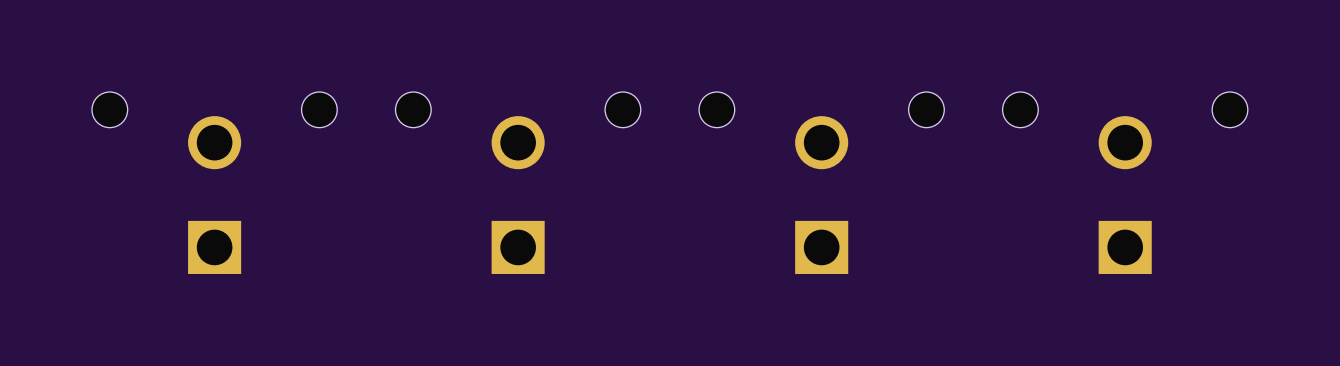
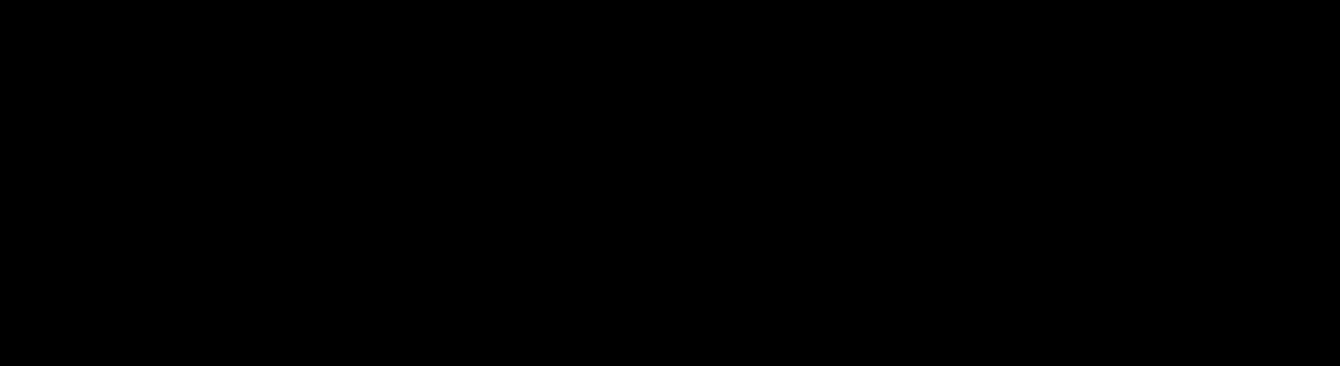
part: (214, 183) -> none
part: (518, 183) -> none
part: (821, 183) -> none
part: (1125, 183) -> none

